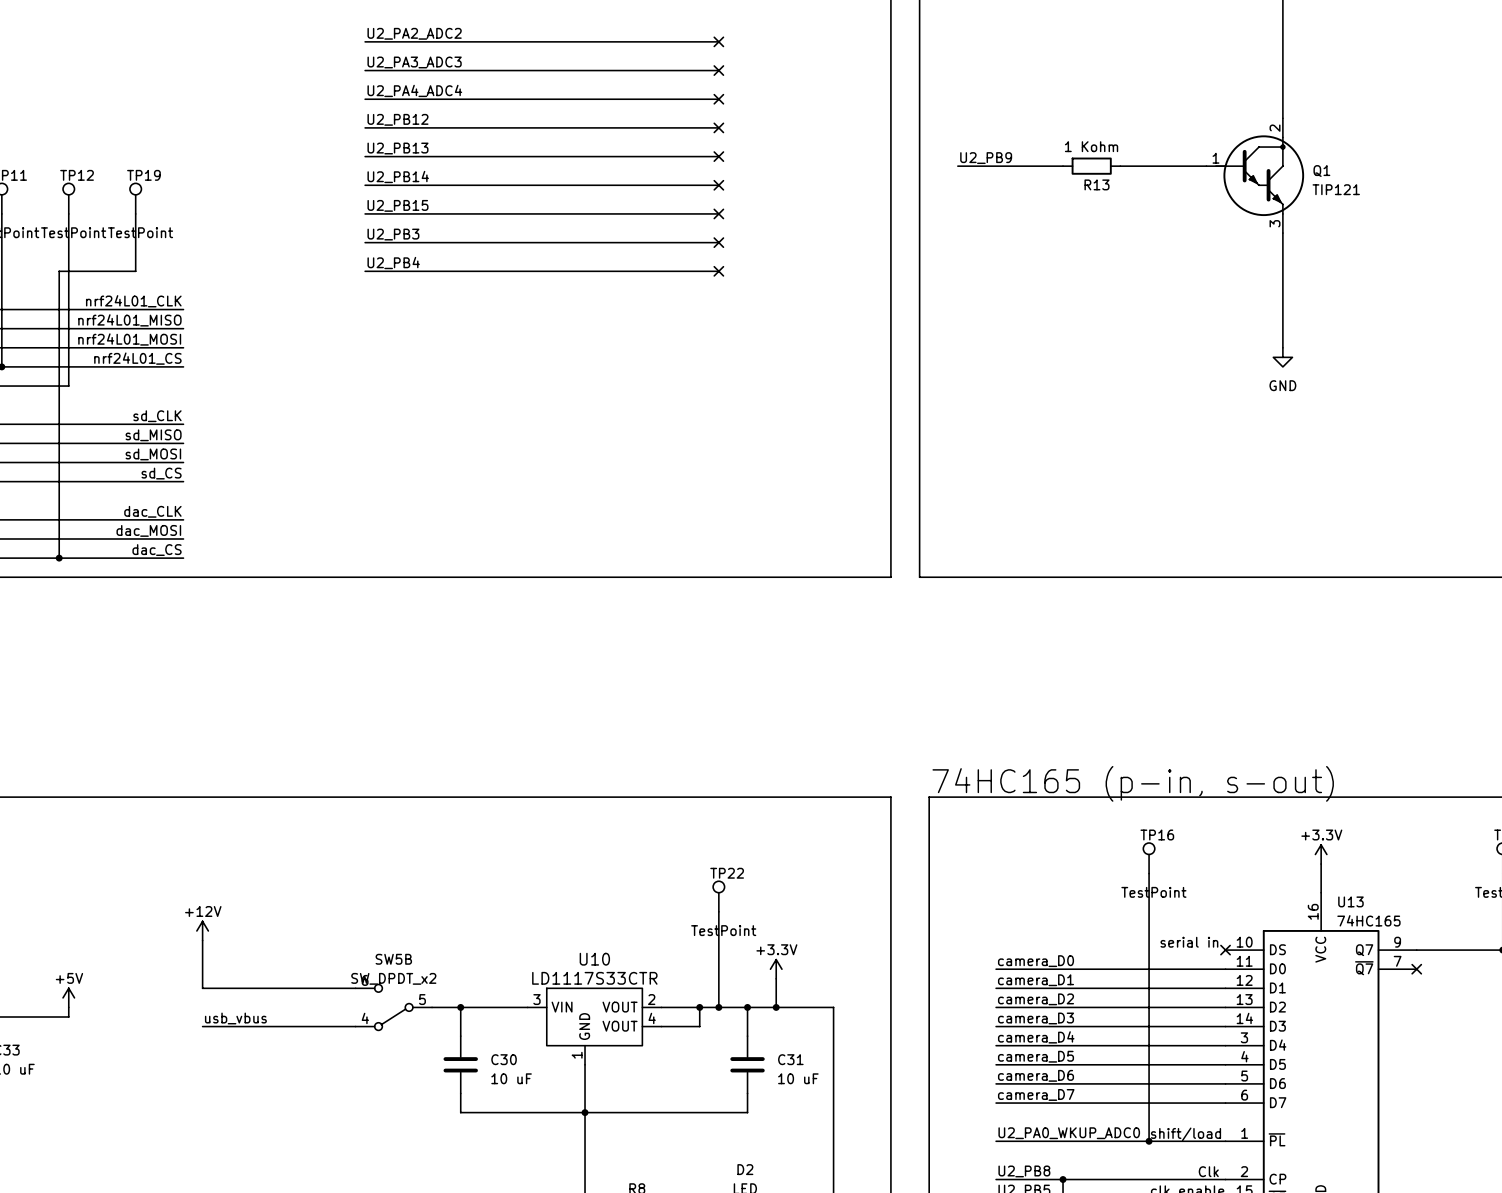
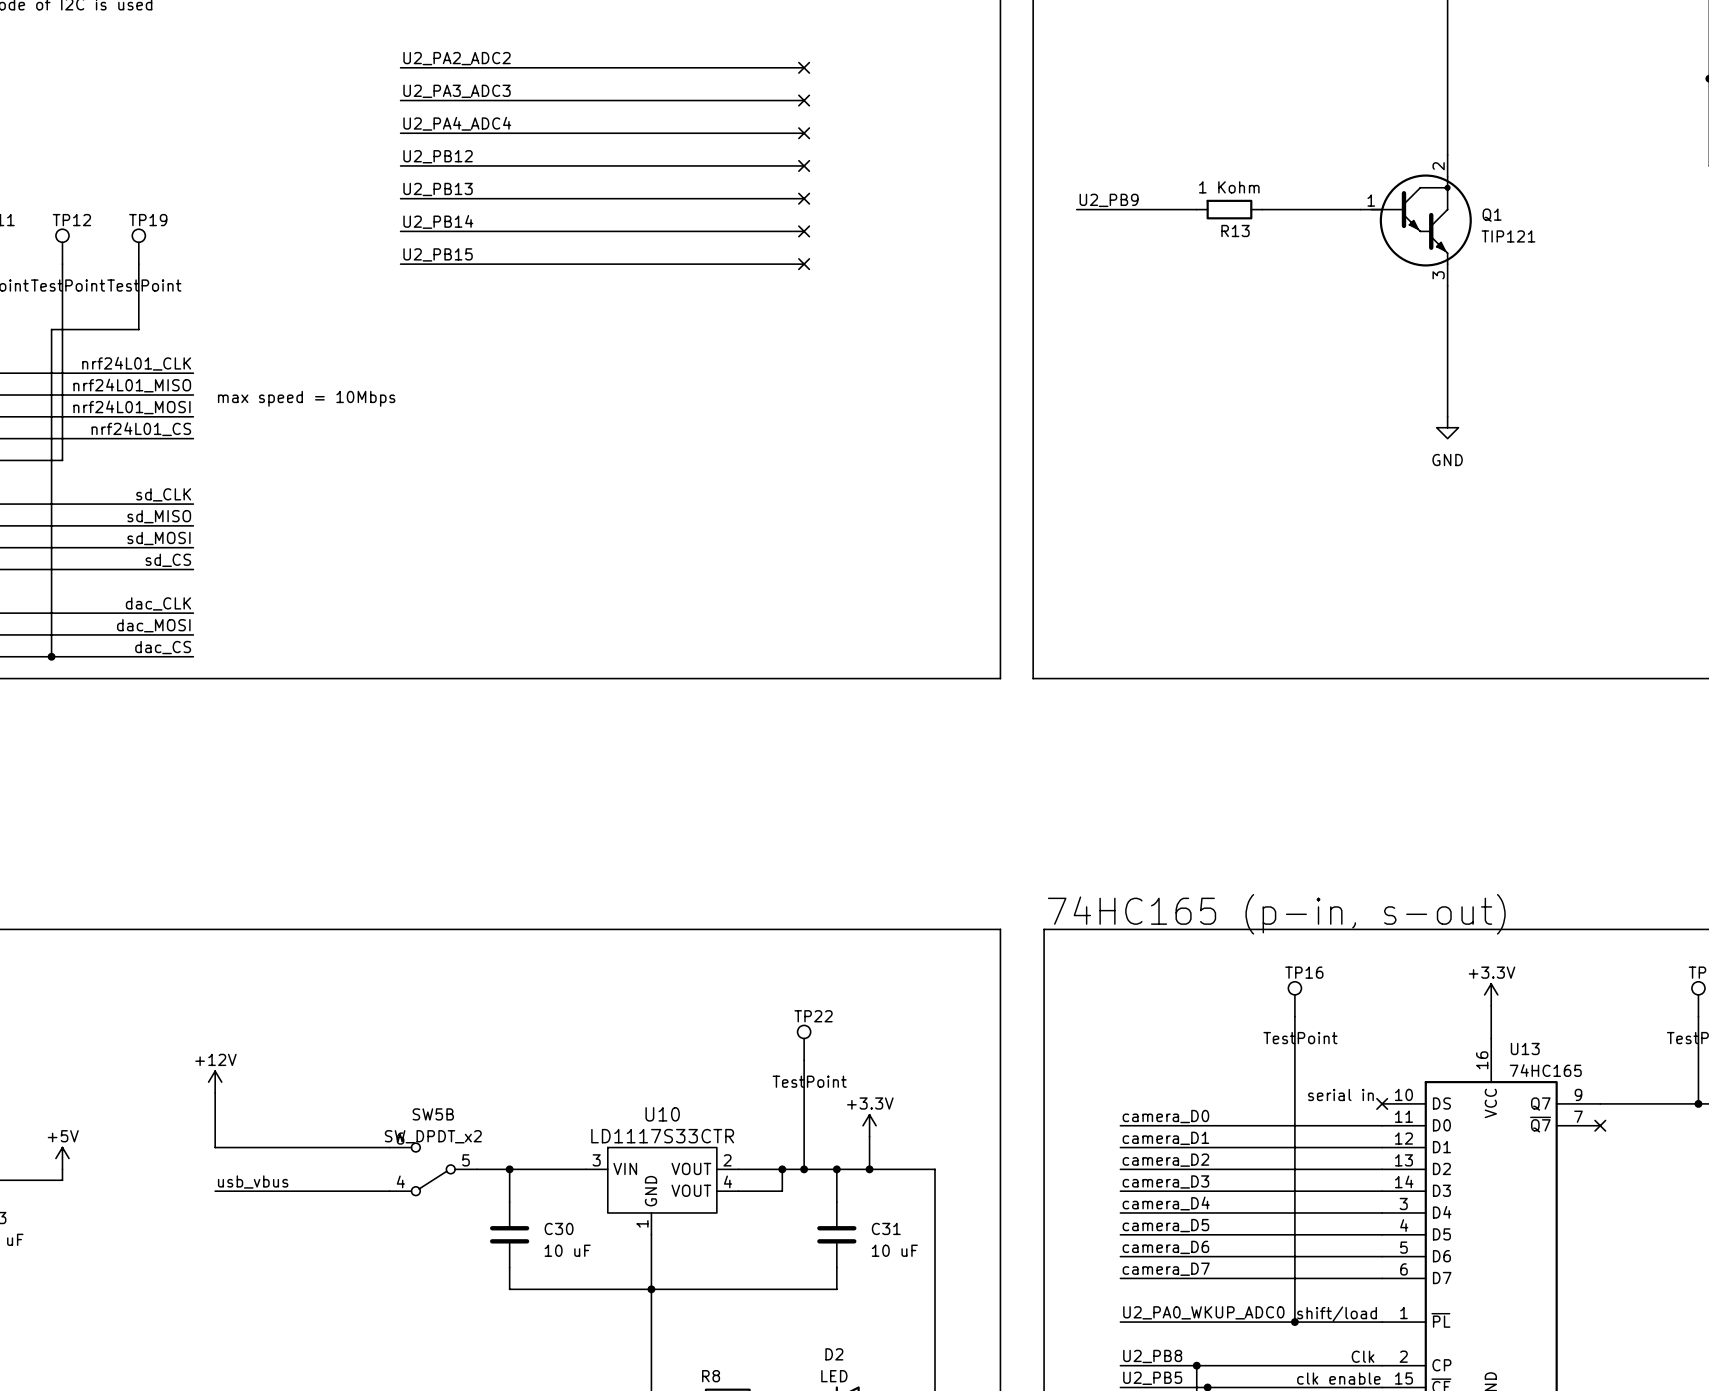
label: U2_PB3 (393, 234) -> none
wire: (365, 242) (718, 242) -> none
no-connect mark: (718, 242) -> none
label: U2_PB4 (393, 263) -> none
wire: (365, 271) (718, 271) -> none
no-connect mark: (718, 271) -> none
text: none -> max speed = 10Mbps (306, 398)

